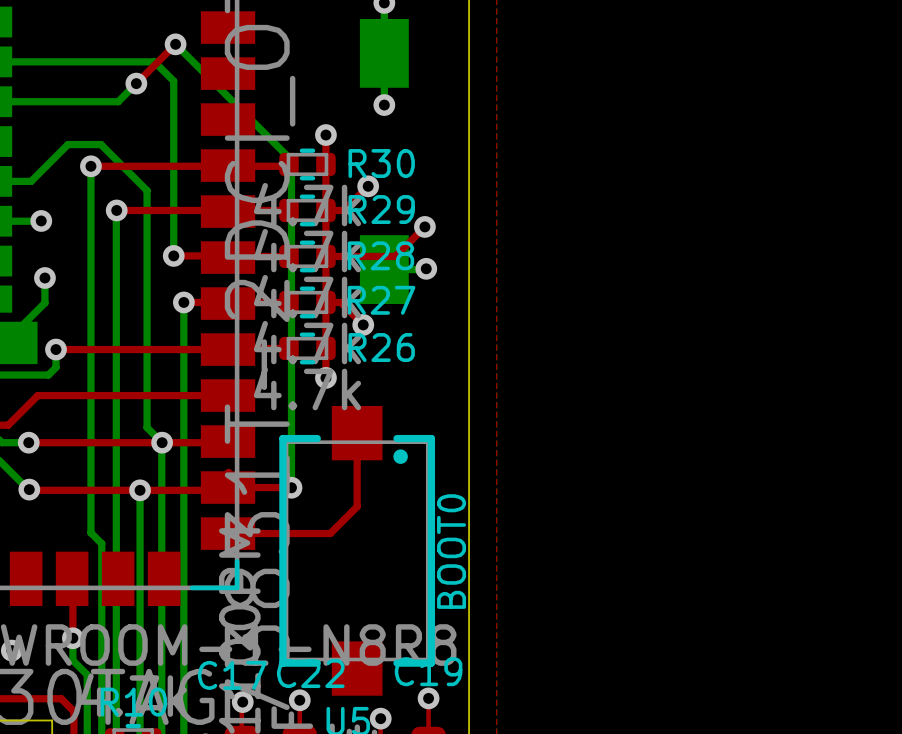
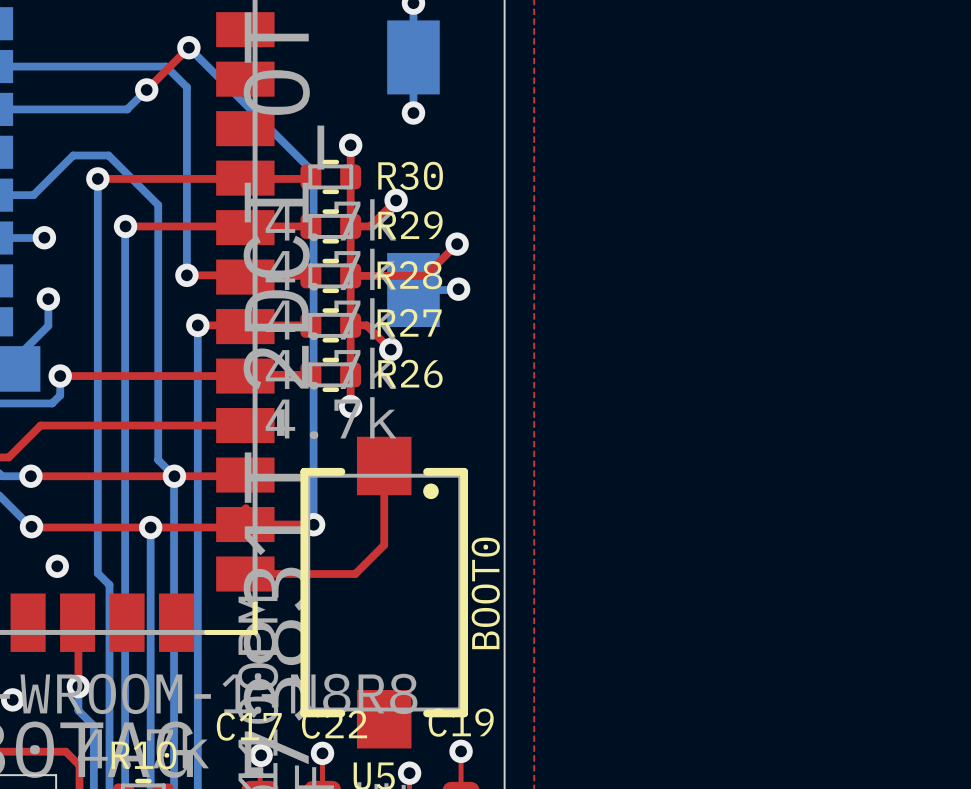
via: none -> (57, 566)

